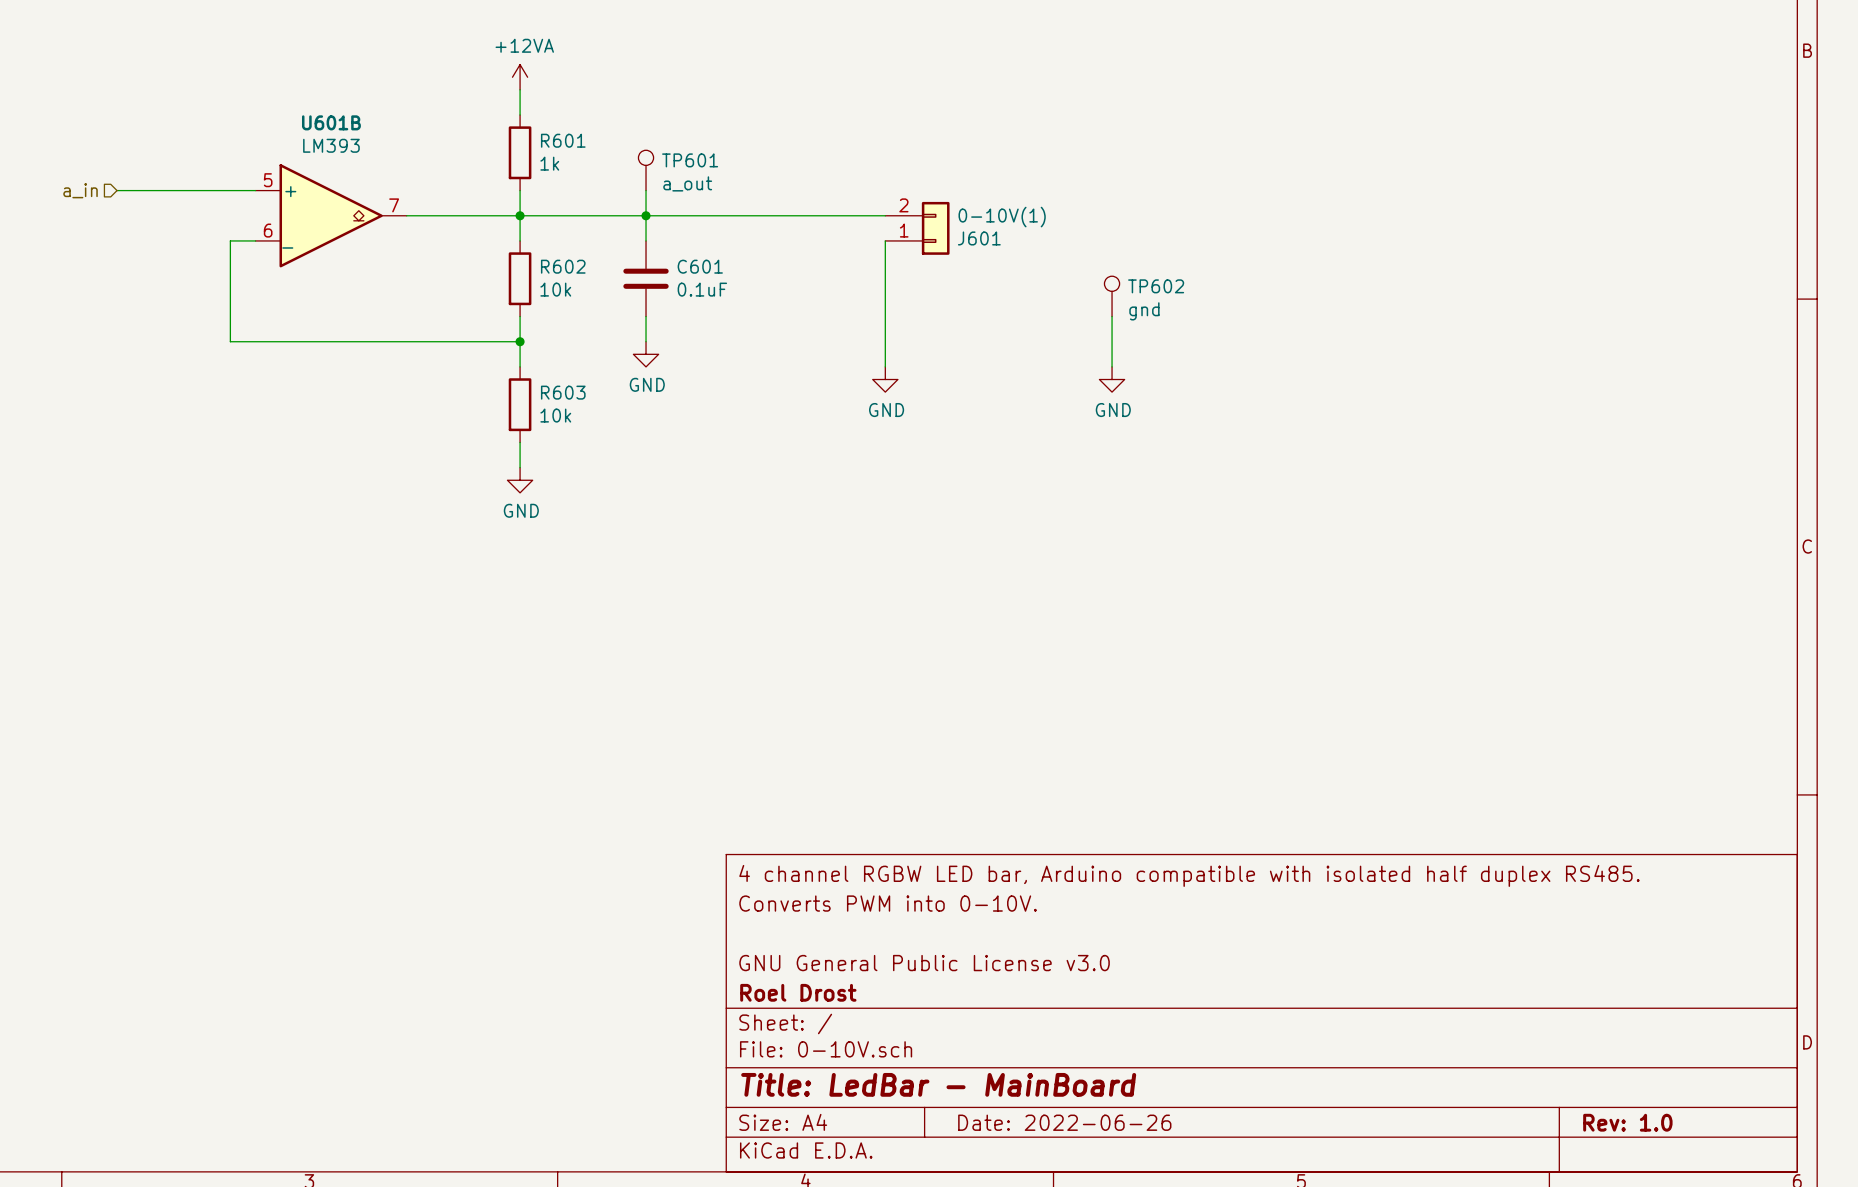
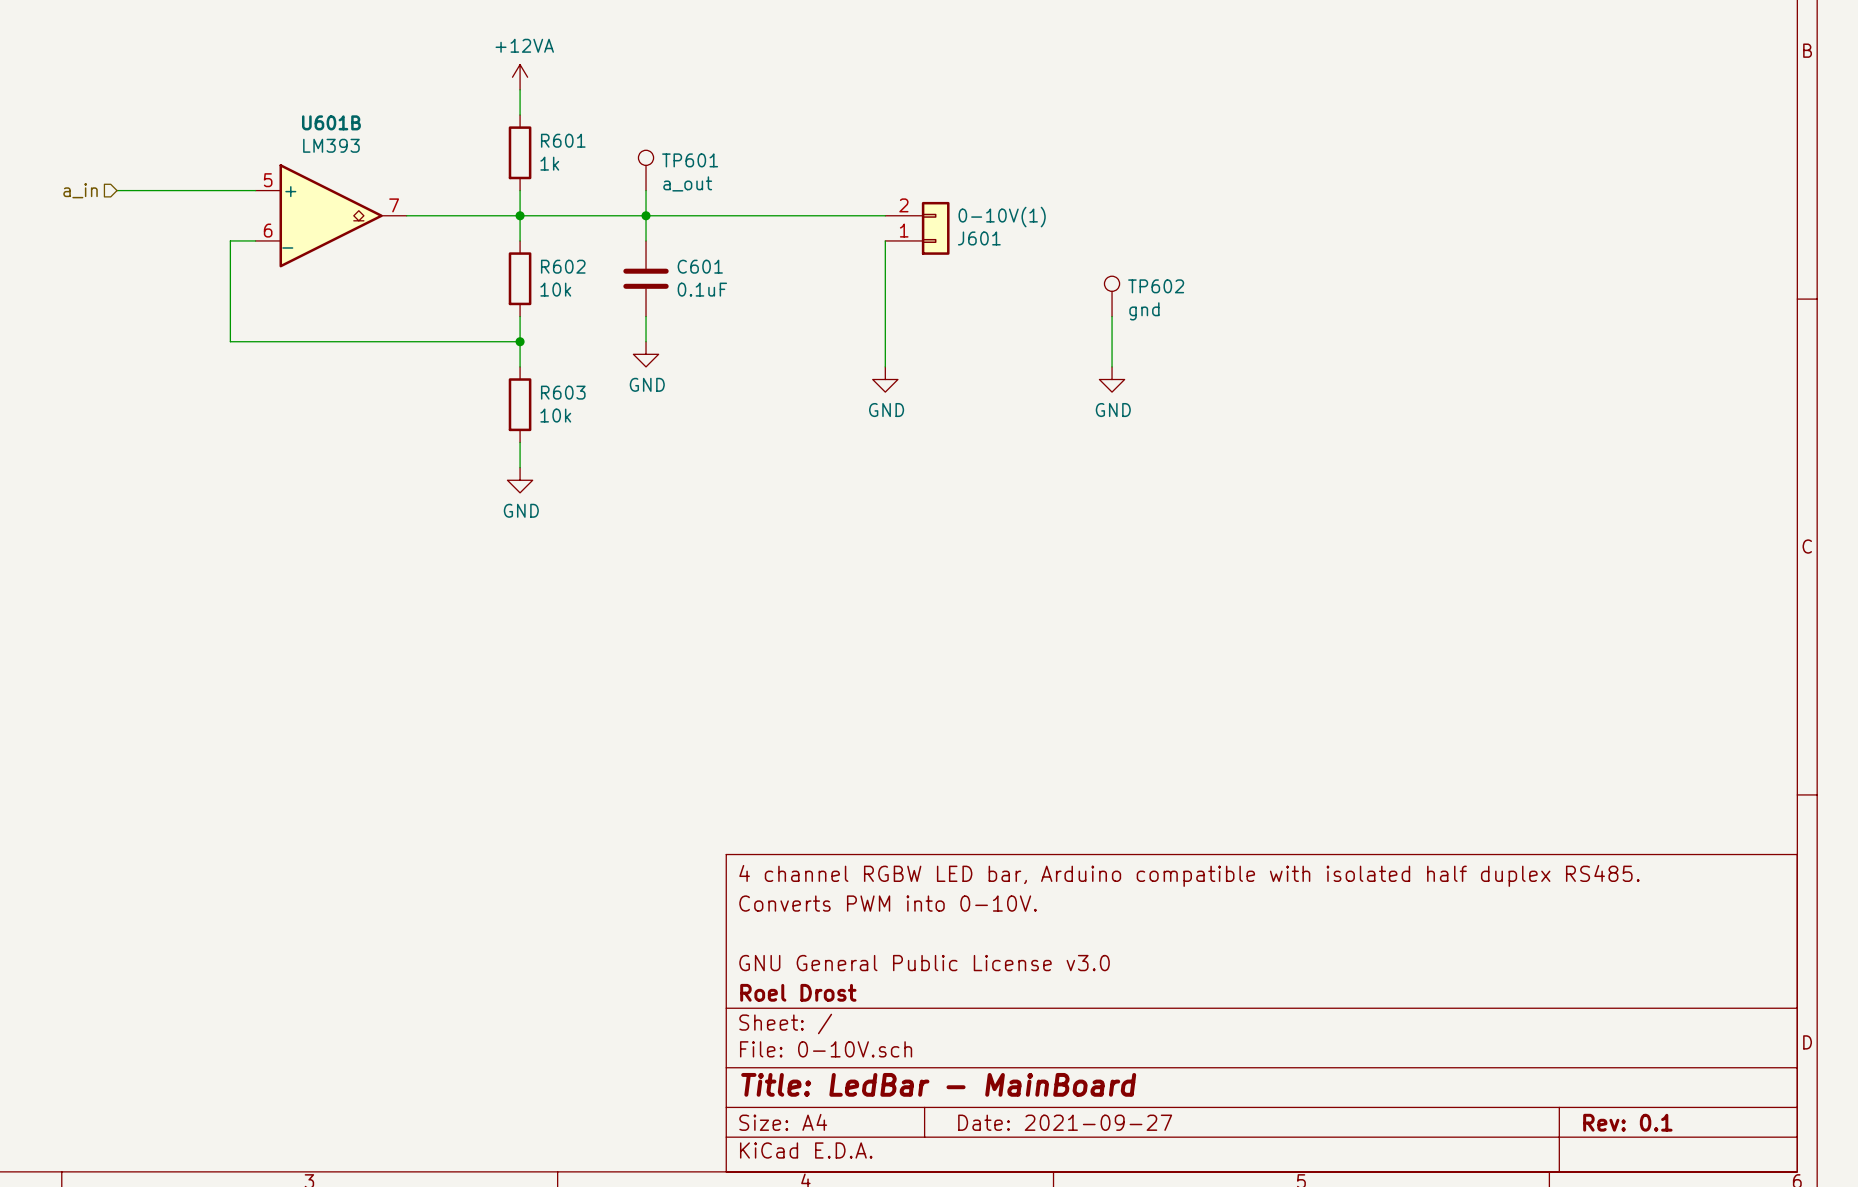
title block: Date: 2022-06-26 (1064, 1122) -> Date: 2021-09-27 (1065, 1122)
title block: Rev: 1.0 (1627, 1122) -> Rev: 0.1 (1627, 1122)

